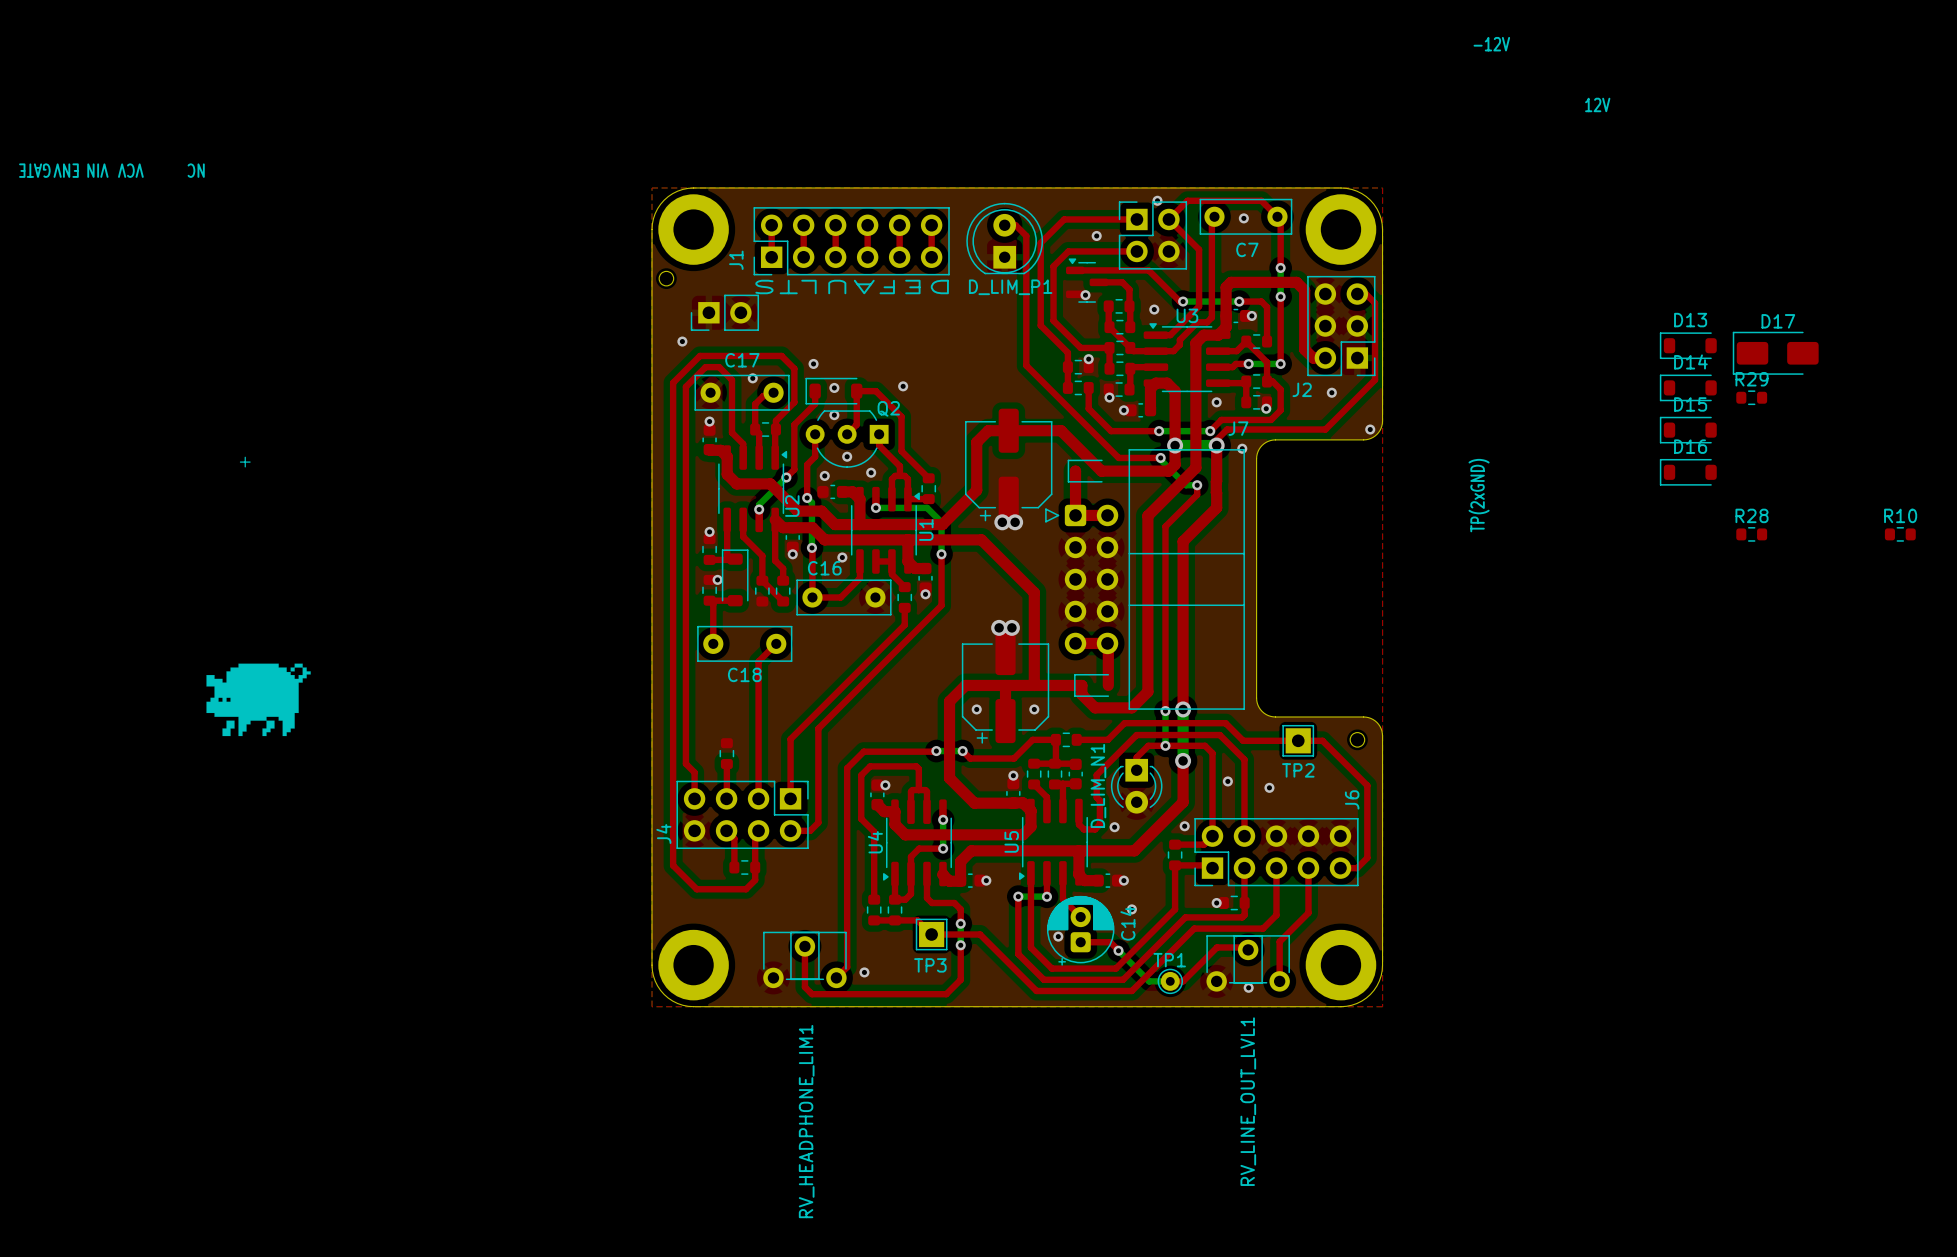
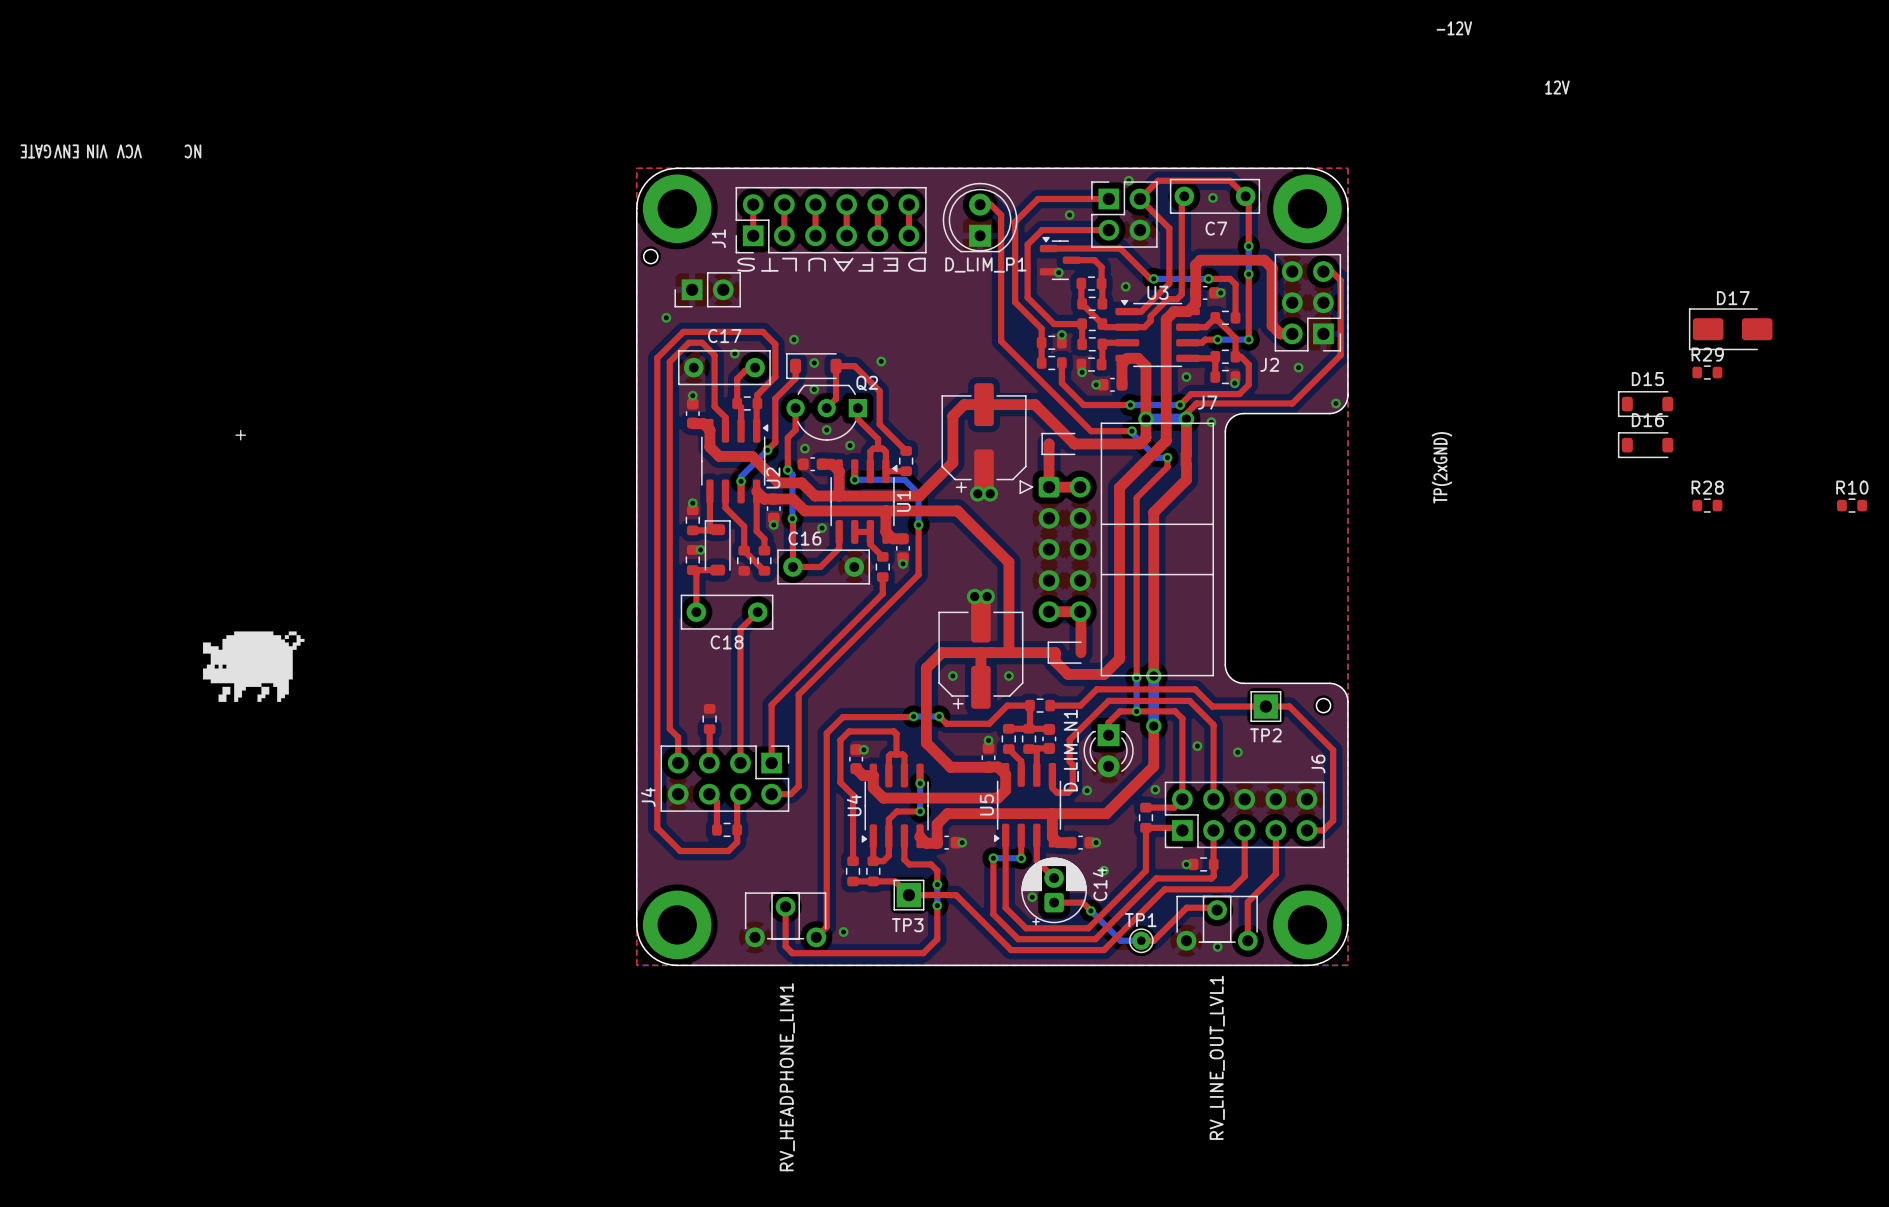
D13: (1688, 345) -> none
D14: (1688, 387) -> none

